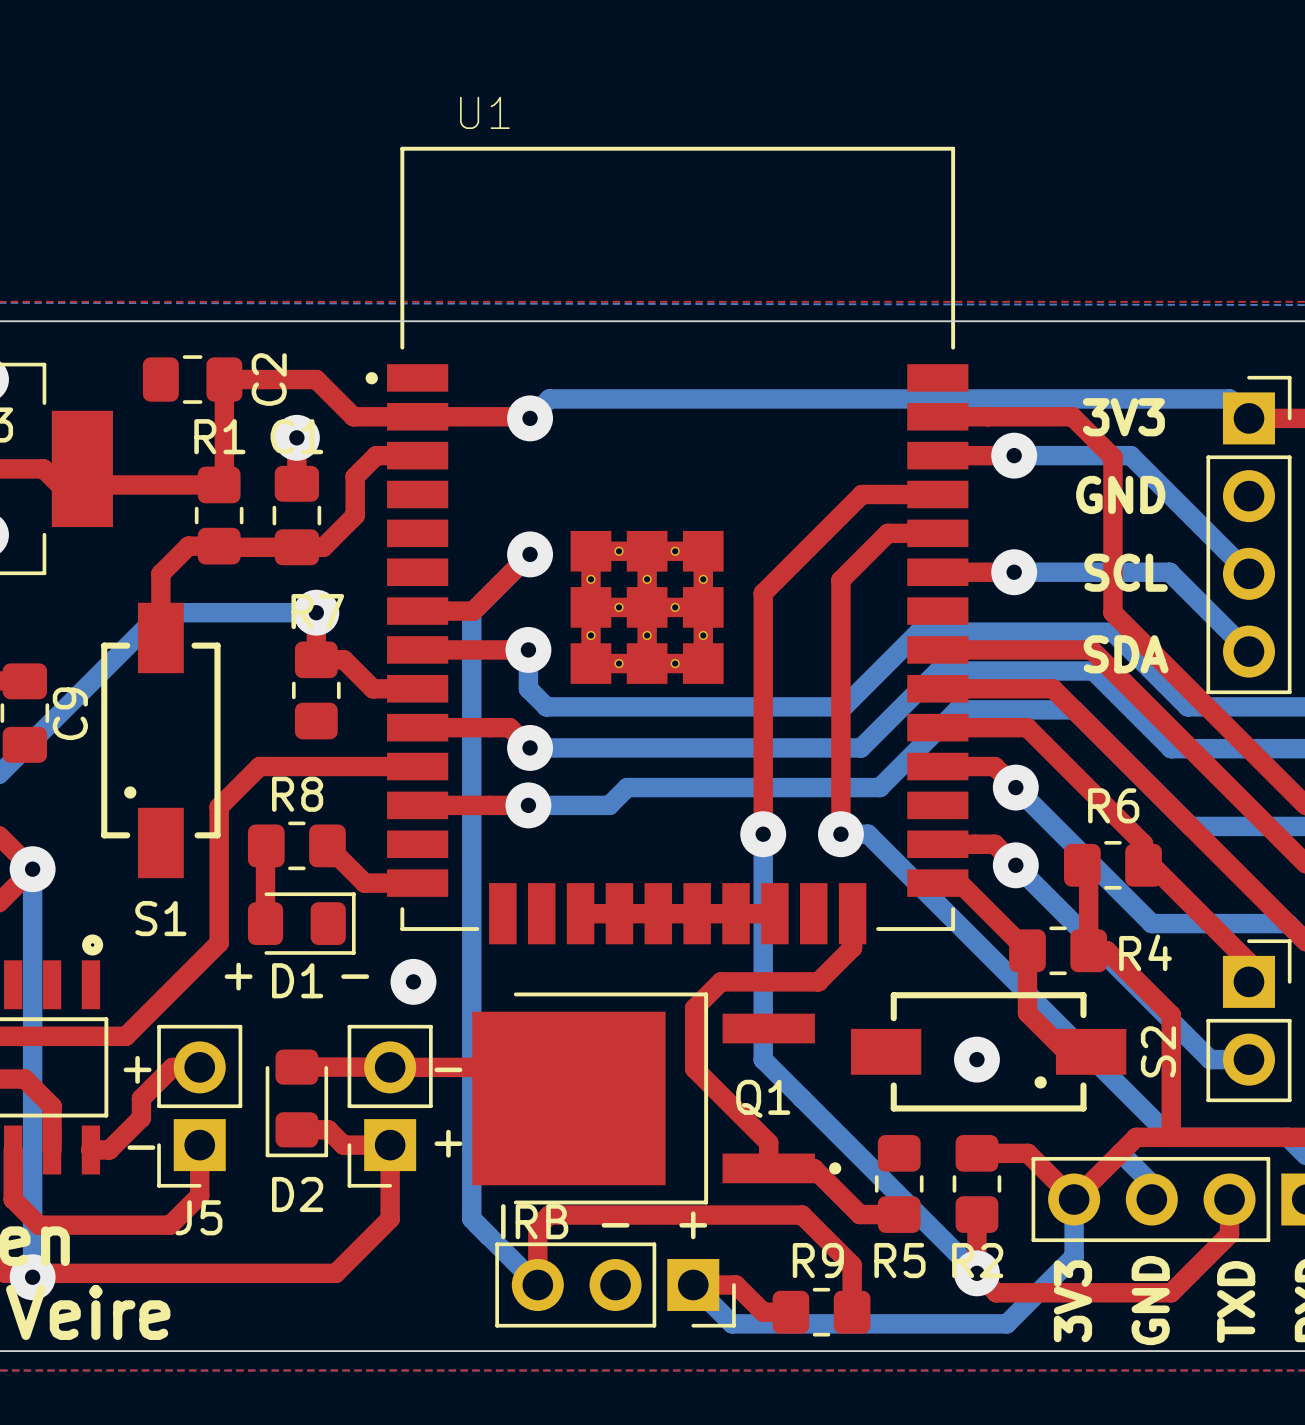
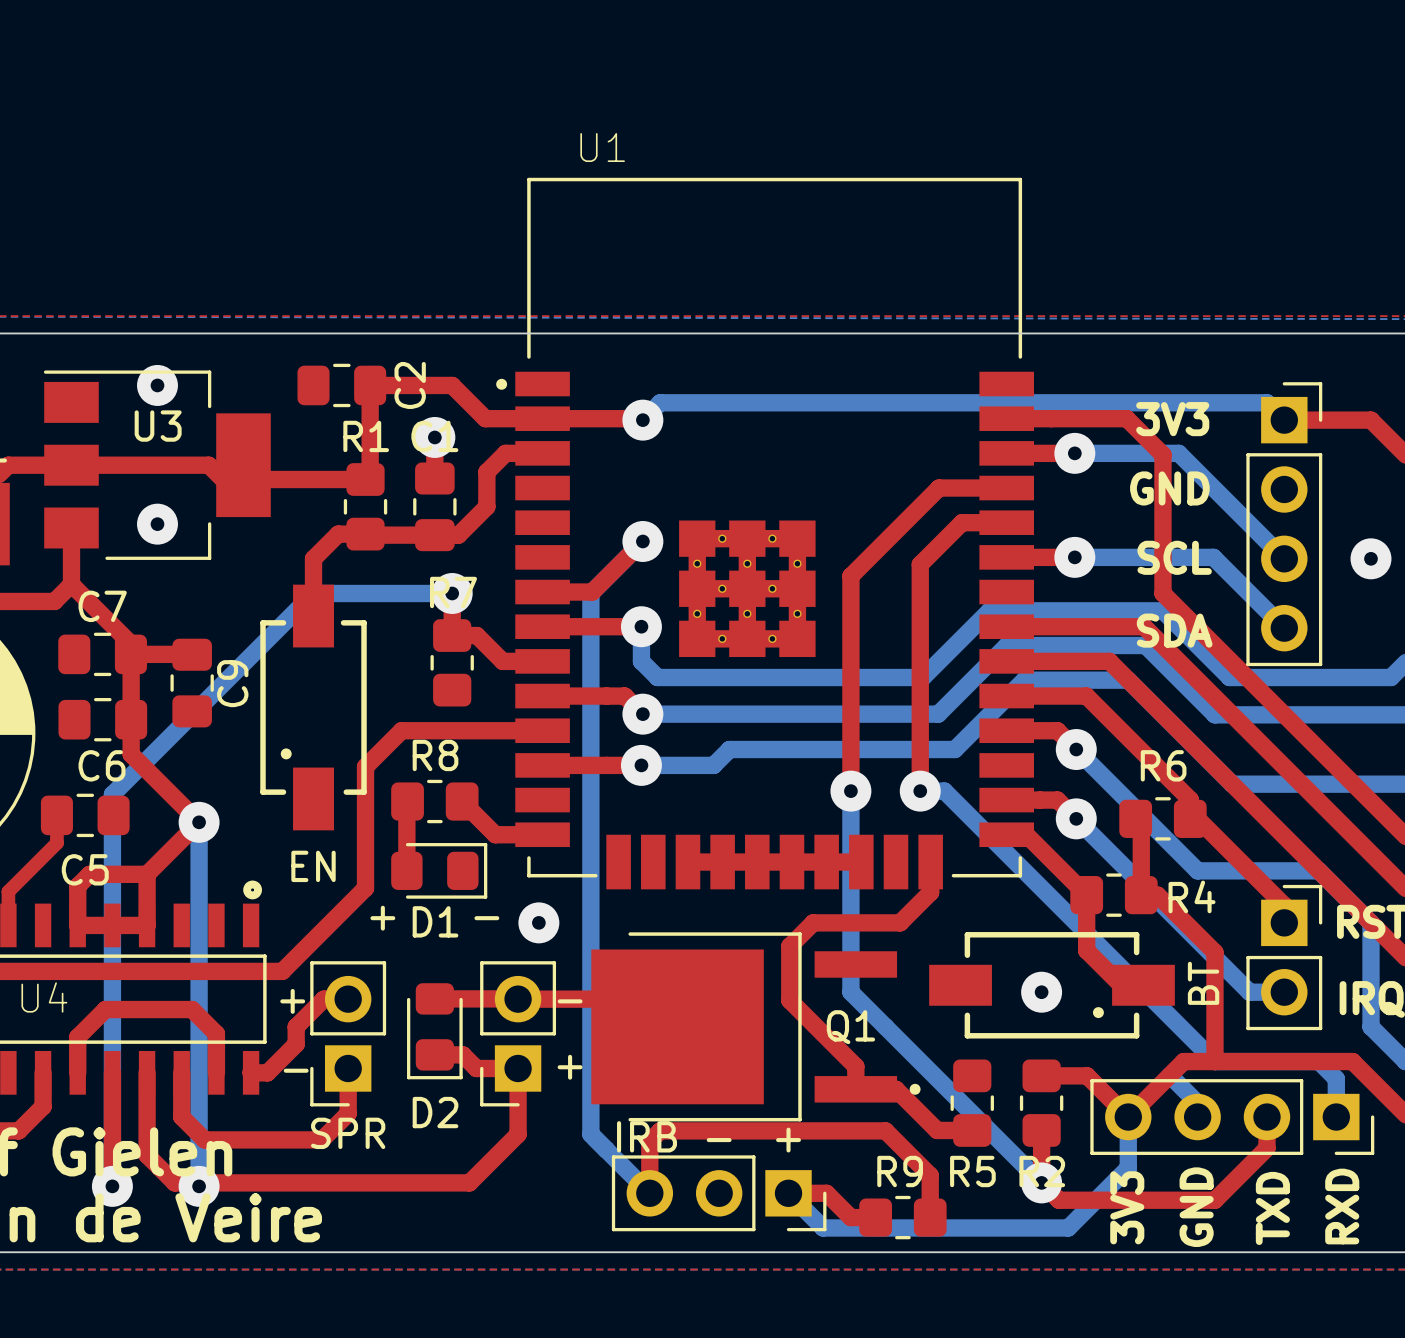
S1 name: S1 (160, 918) -> EN (313, 866)
S2 name: S2 (1158, 1051) -> BT (1203, 983)
J5 name: J5 (199, 1217) -> SPR (348, 1133)

